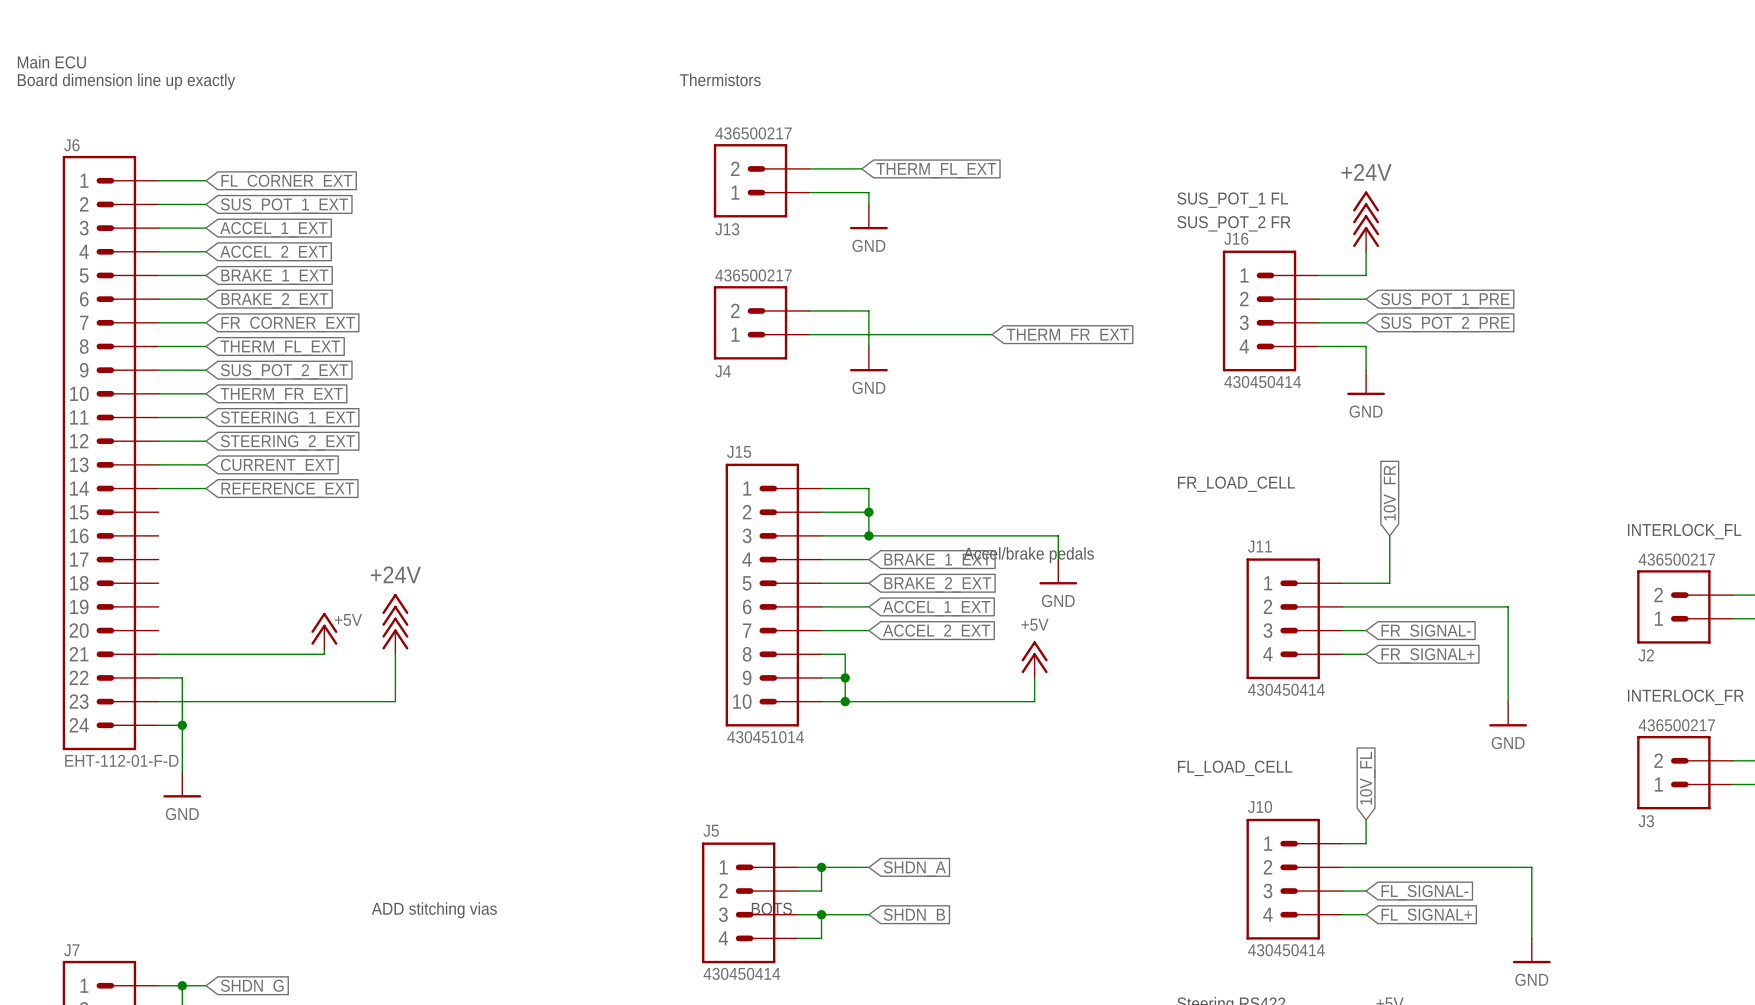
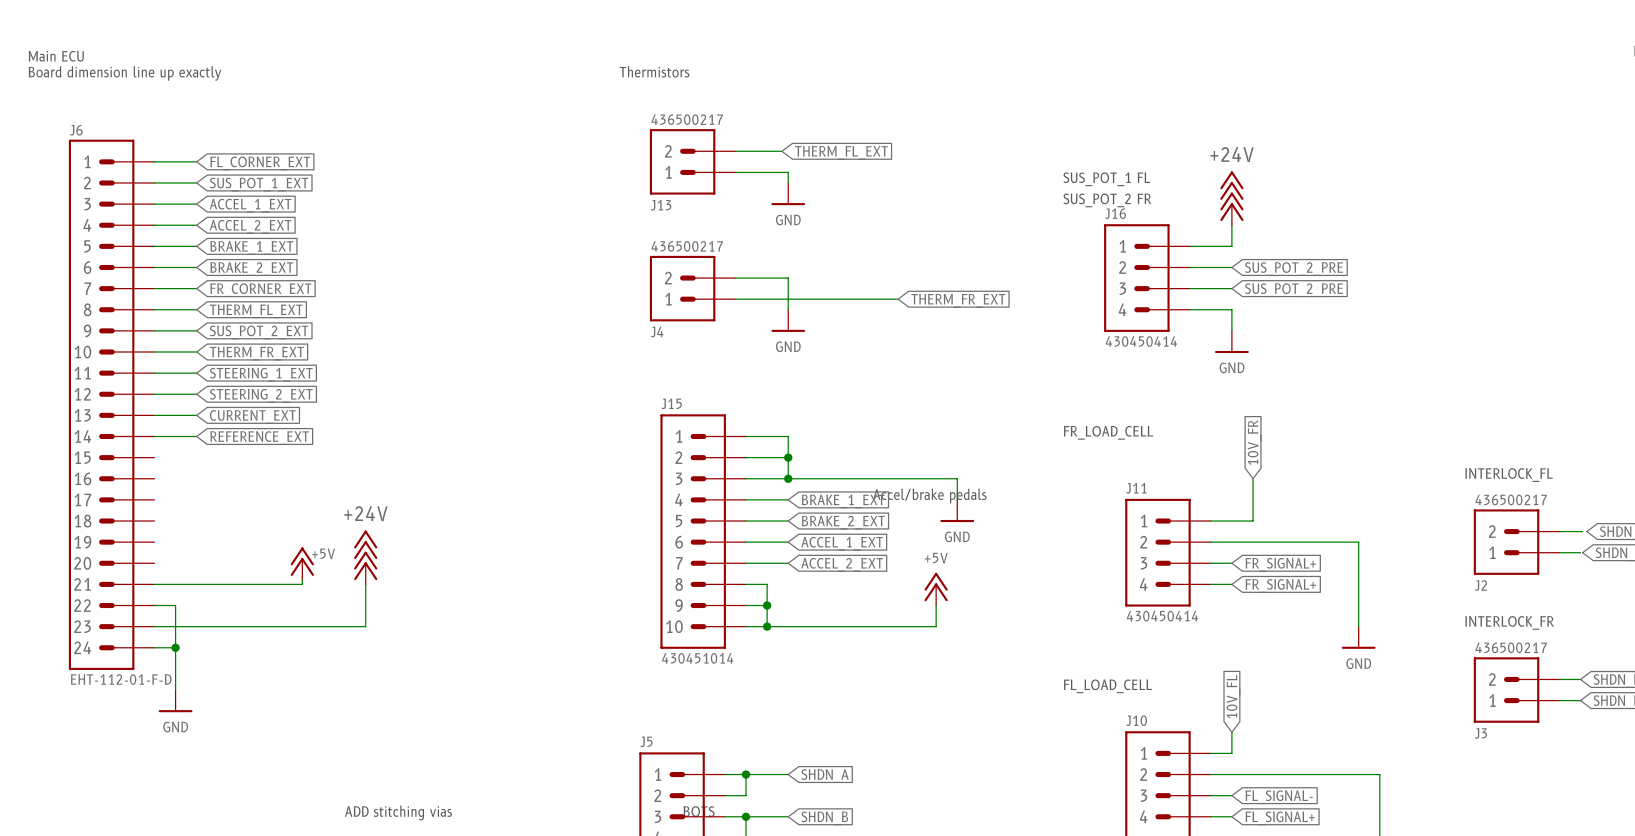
global label: SUS_POT_1_PRE (1445, 300) -> SUS_POT_2_PRE (1294, 269)
global label: FR_SIGNAL- (1426, 632) -> FR_SIGNAL+ (1280, 564)

